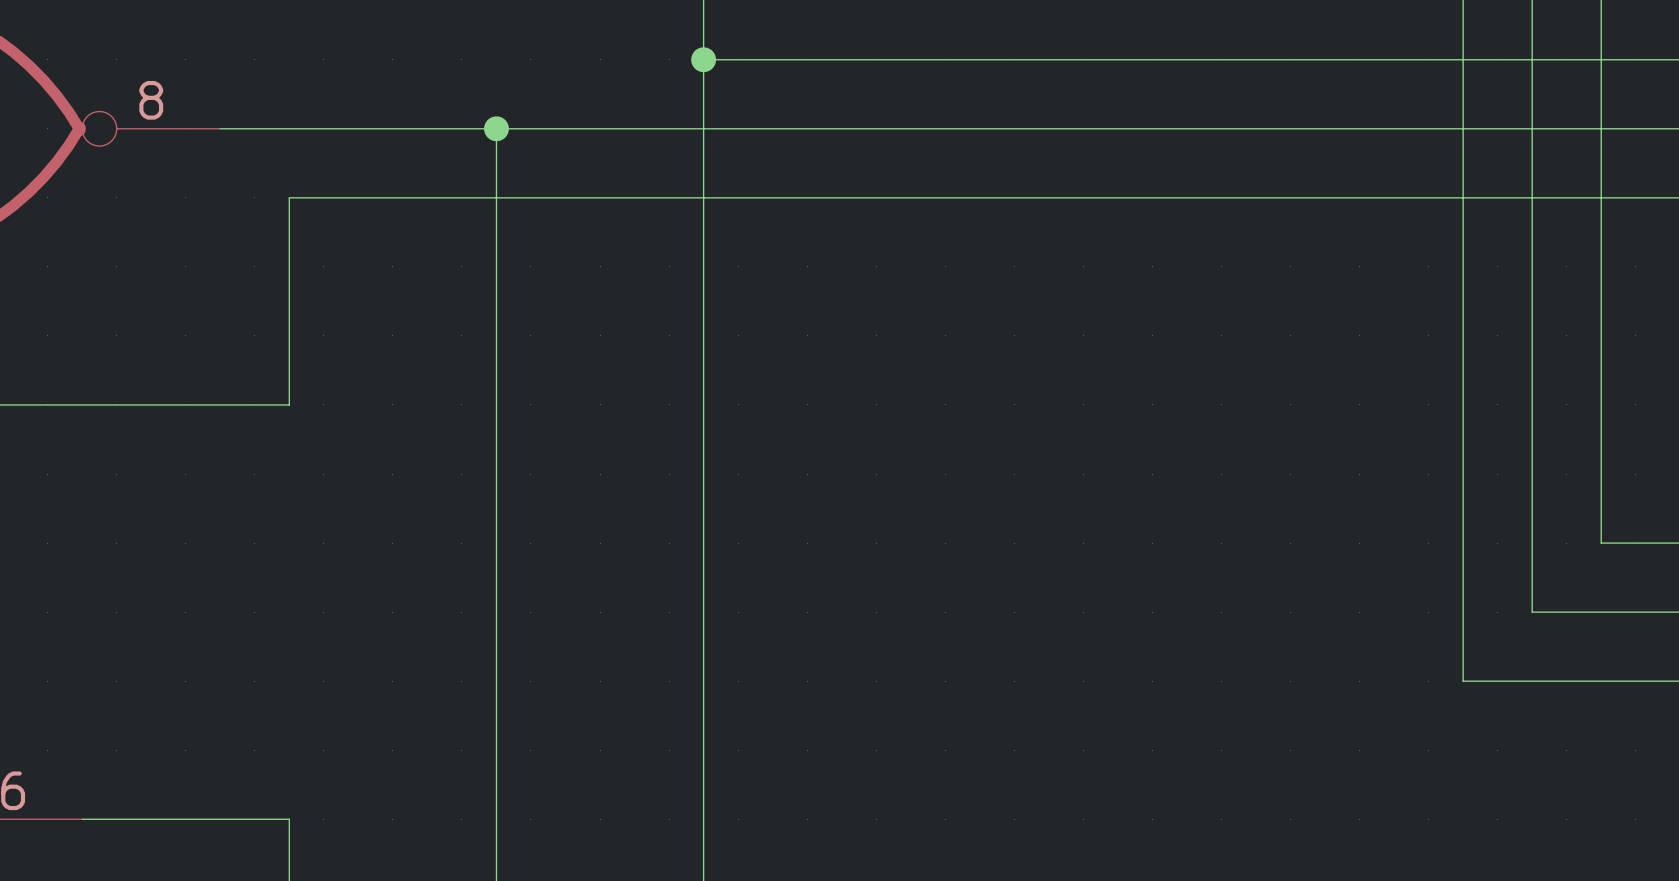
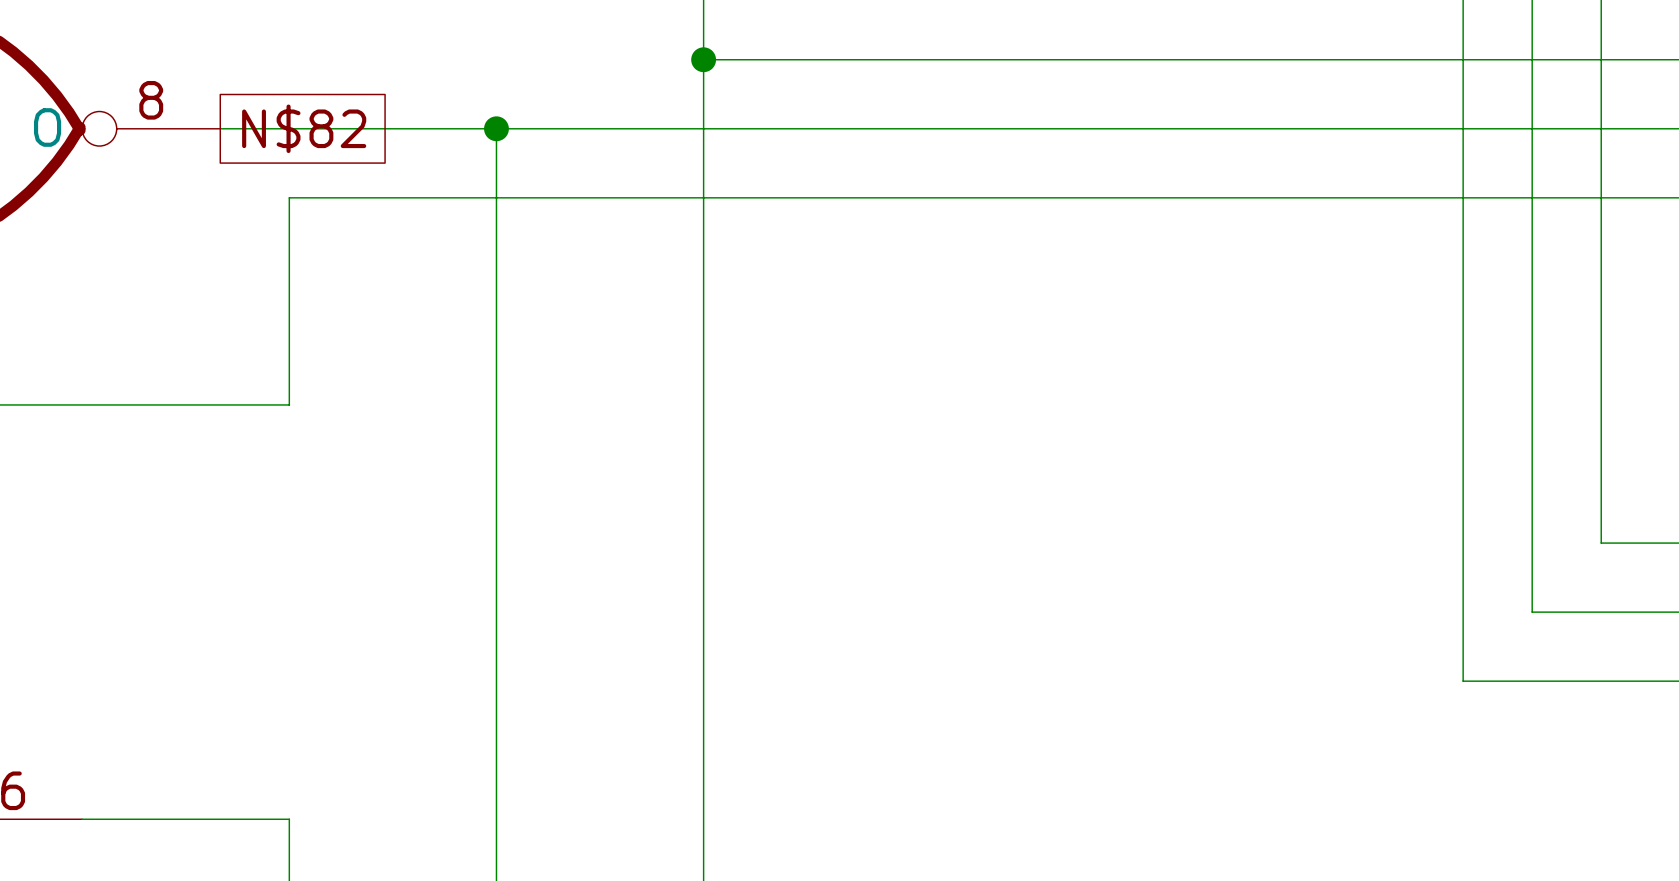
part pin name: none -> O (47, 127)
global label: none -> N$82 (304, 128)

